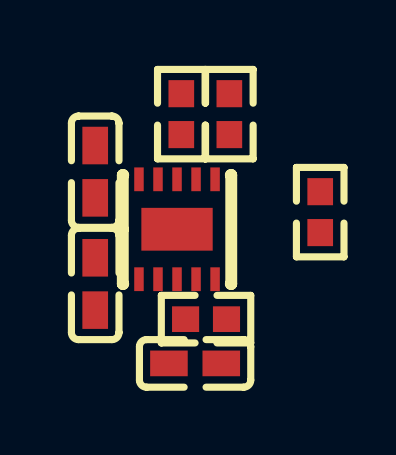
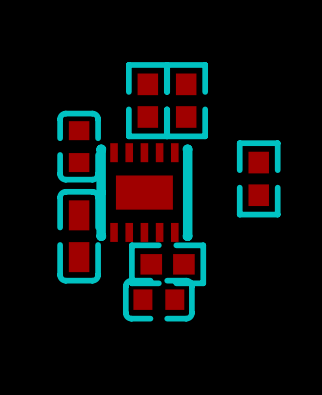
part footprint: [67, 112, 123, 231] -> [57, 110, 101, 183]
part footprint: [135, 336, 255, 391] -> [122, 277, 195, 322]

